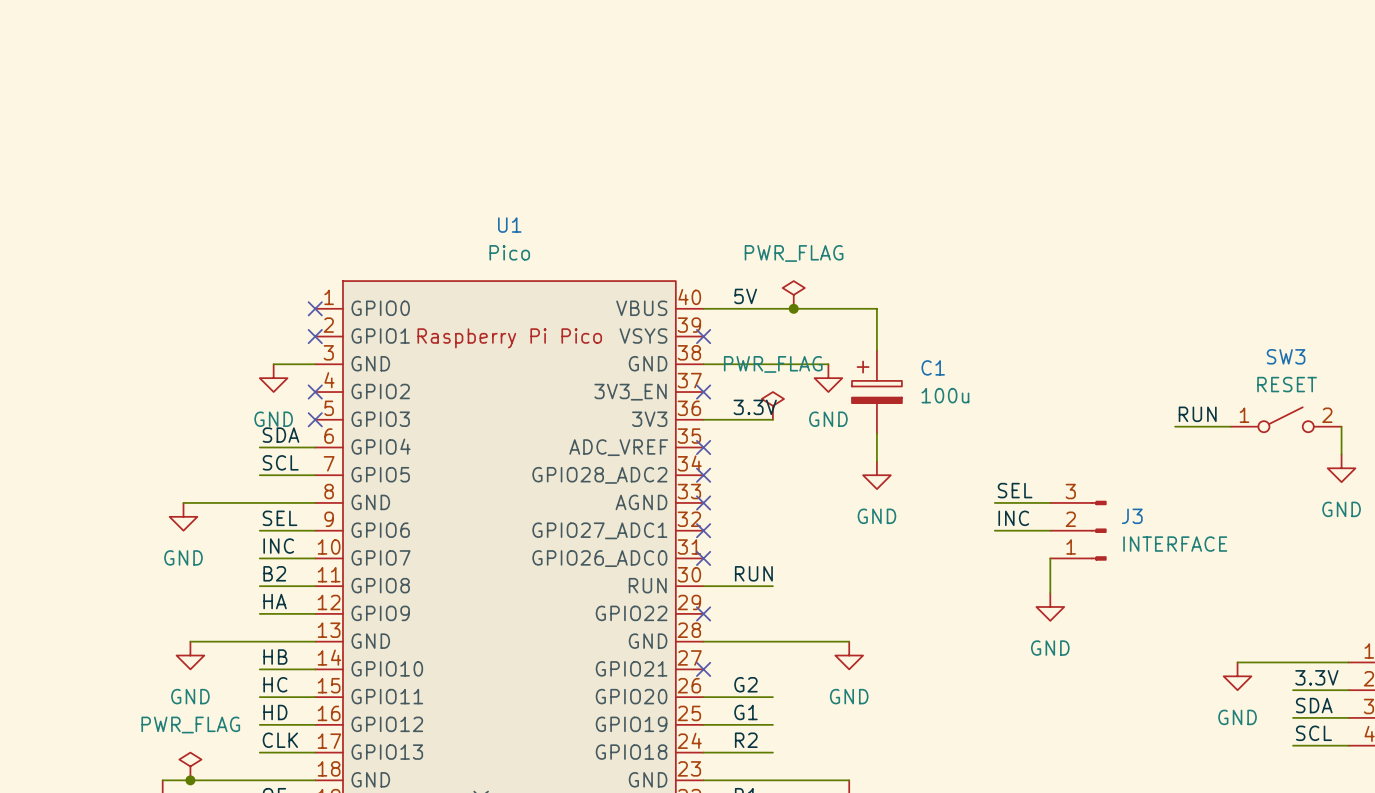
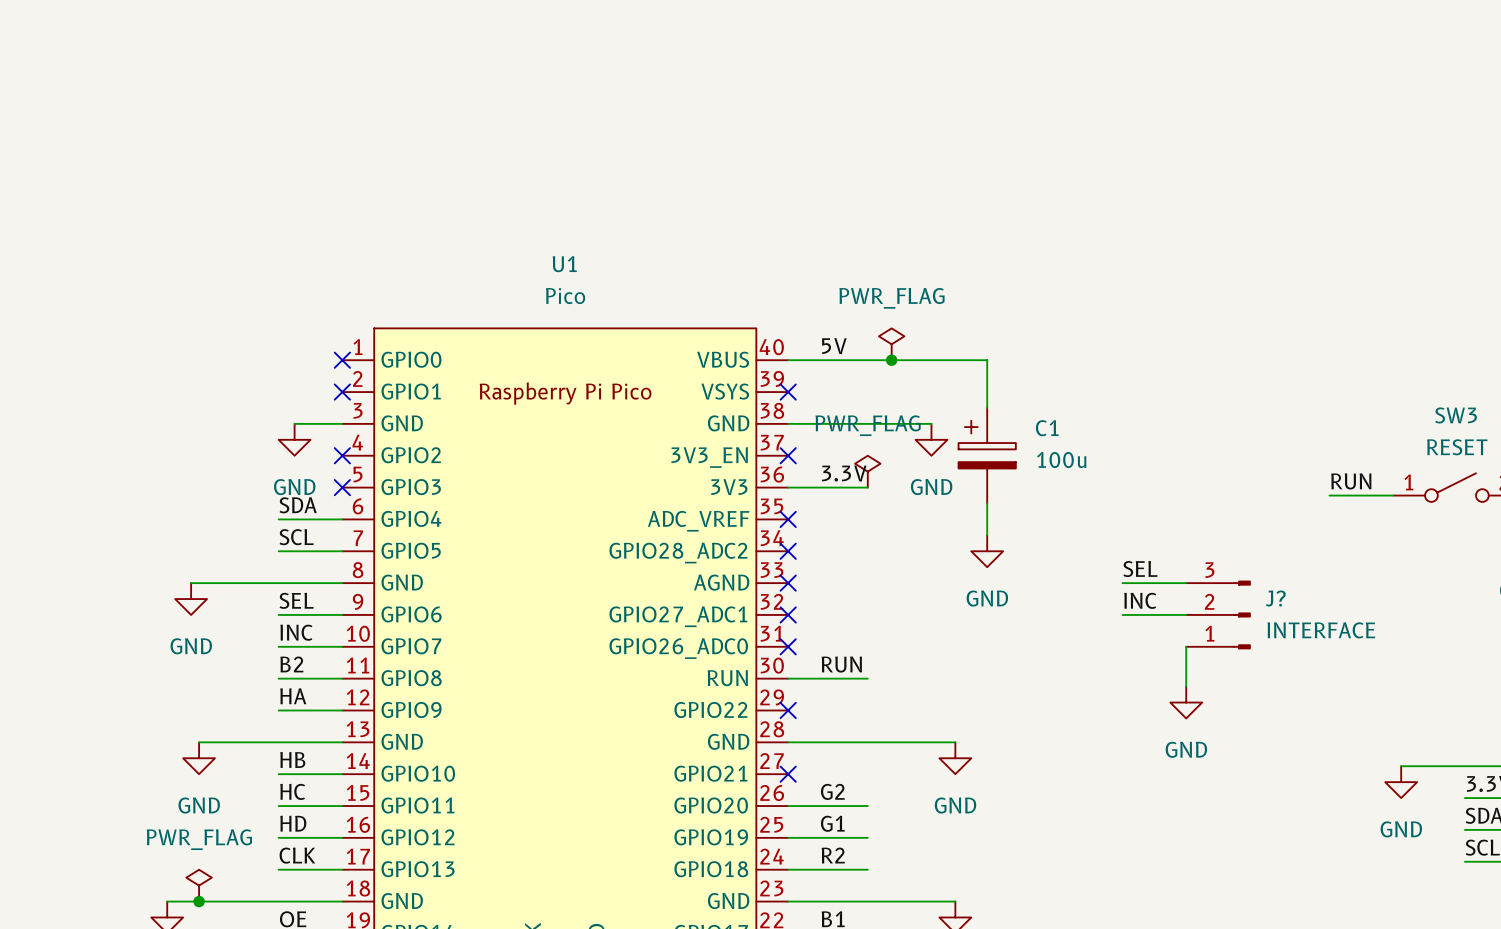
J3 name: J3 (1132, 516) -> J? (1275, 598)

